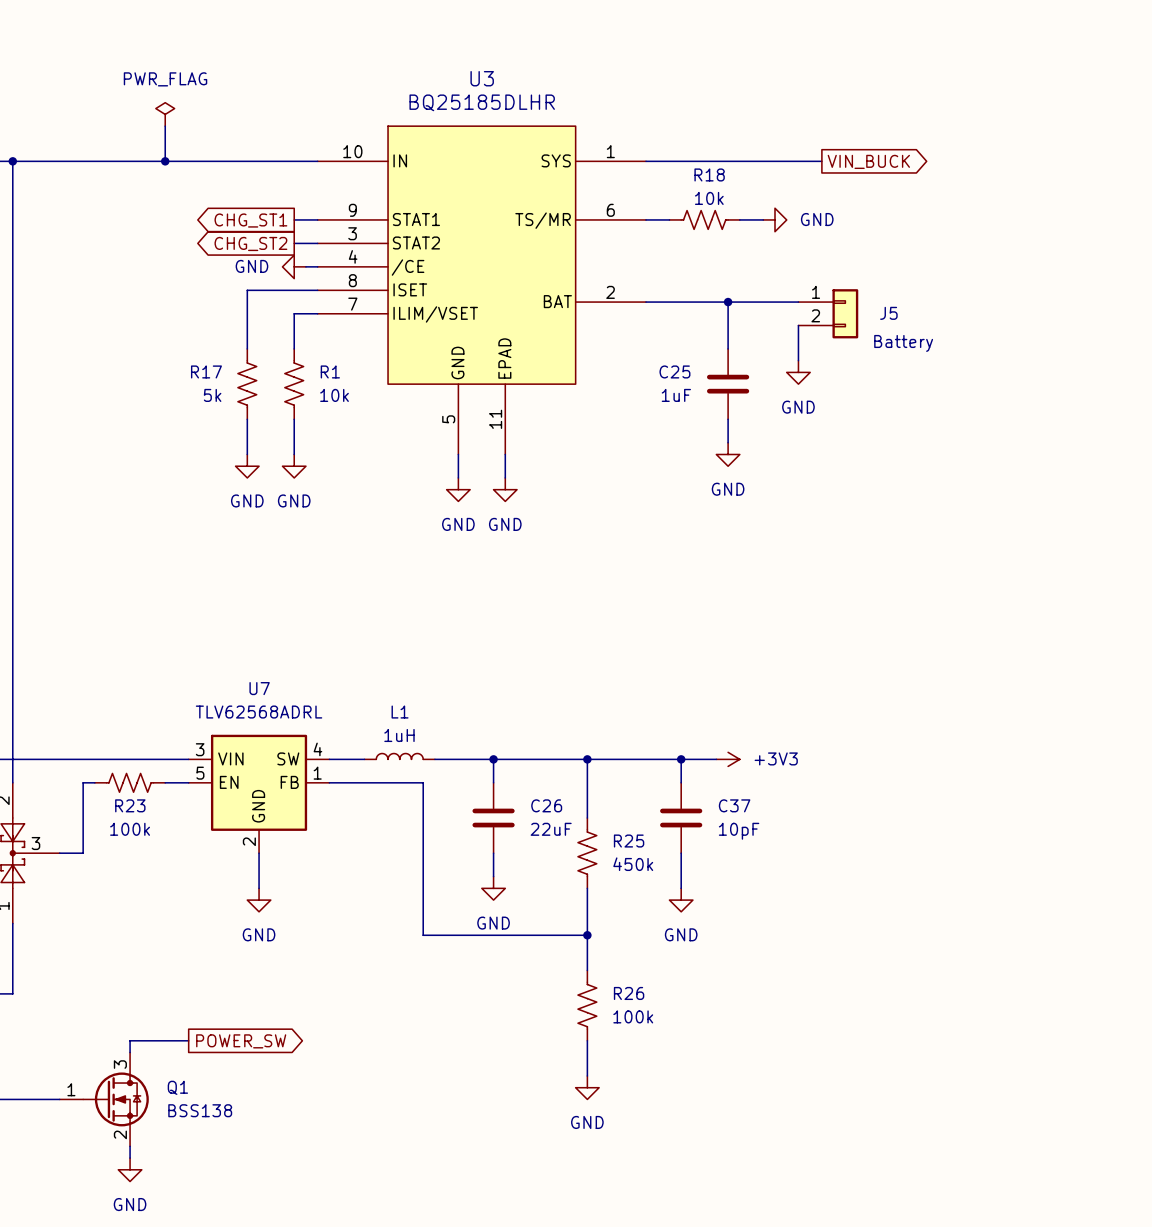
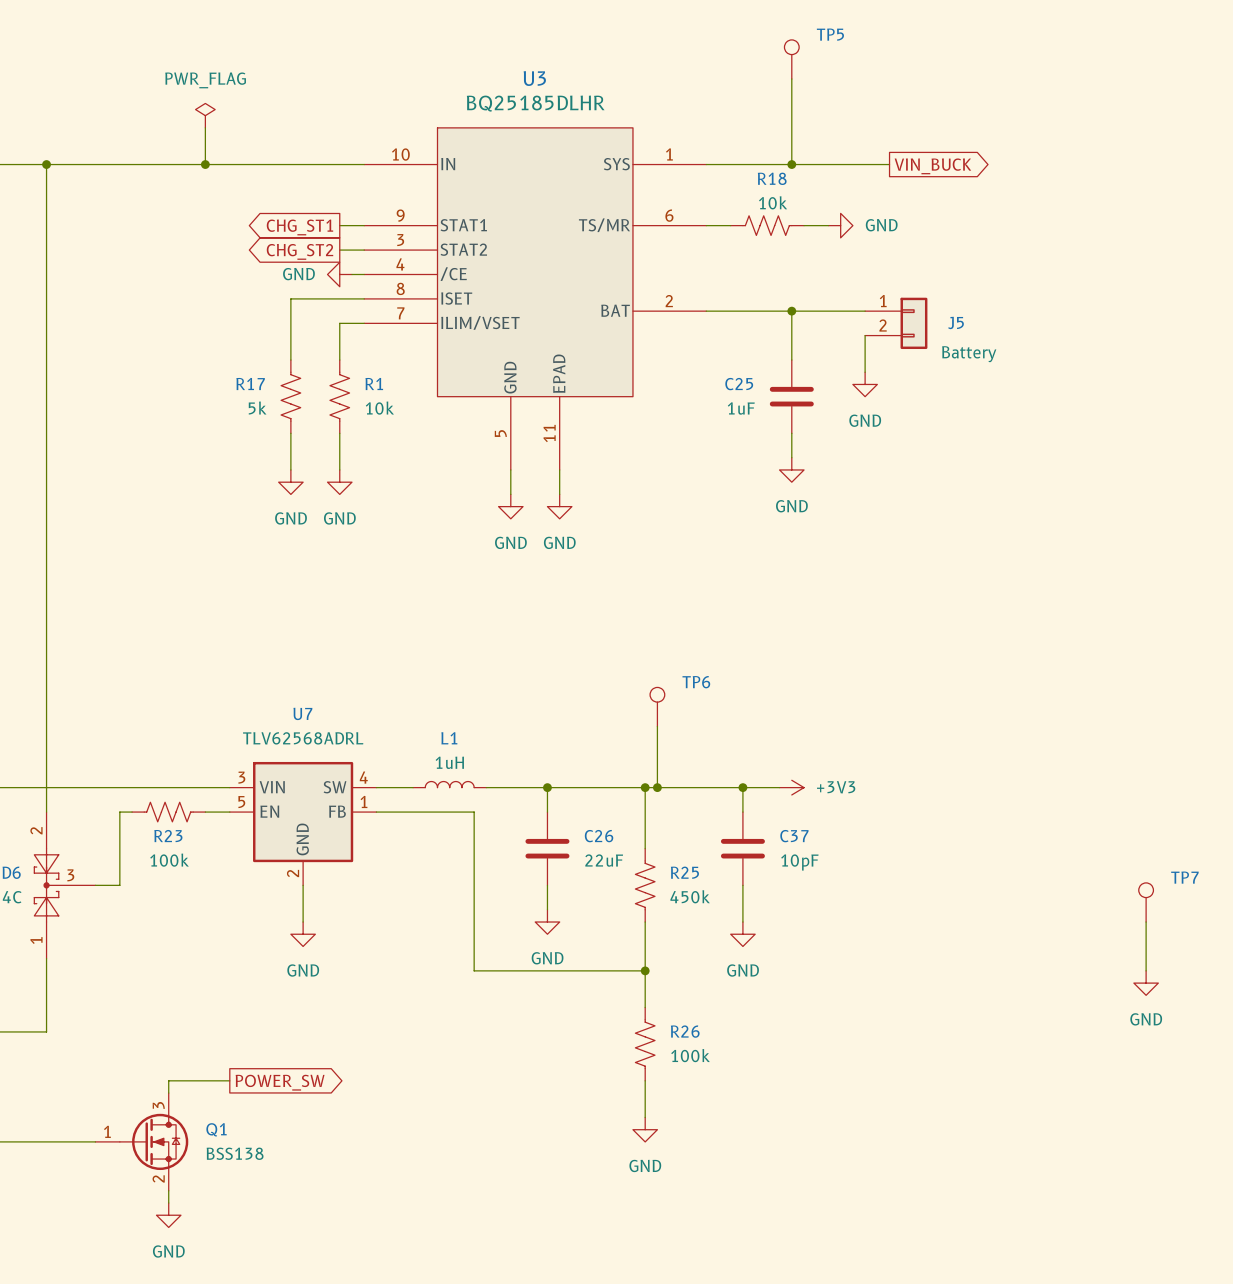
TP5: none -> (791, 59)
wire: none -> (791, 79) (791, 164)
junction: none -> (791, 164)
TP6: none -> (657, 706)
wire: none -> (657, 726) (657, 787)
junction: none -> (657, 787)
TP7: none -> (1146, 902)
wire: none -> (1146, 922) (1146, 970)
power symbol: none -> GND (1146, 983)

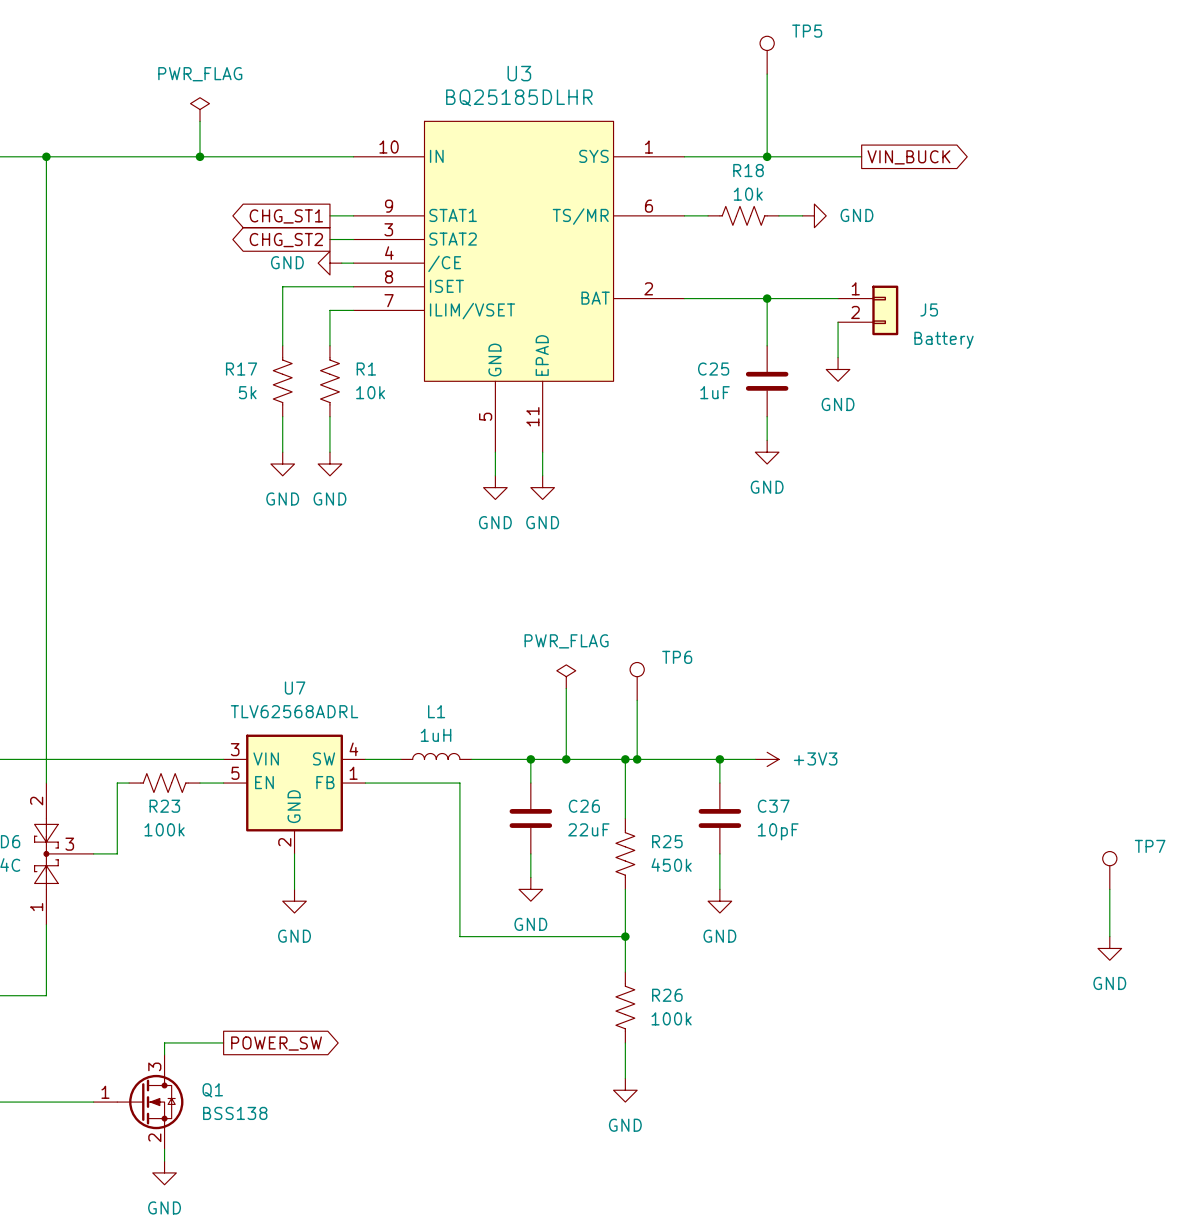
power symbol: none -> PWR_FLAG (566, 676)
wire: none -> (566, 688) (566, 759)
junction: none -> (566, 759)

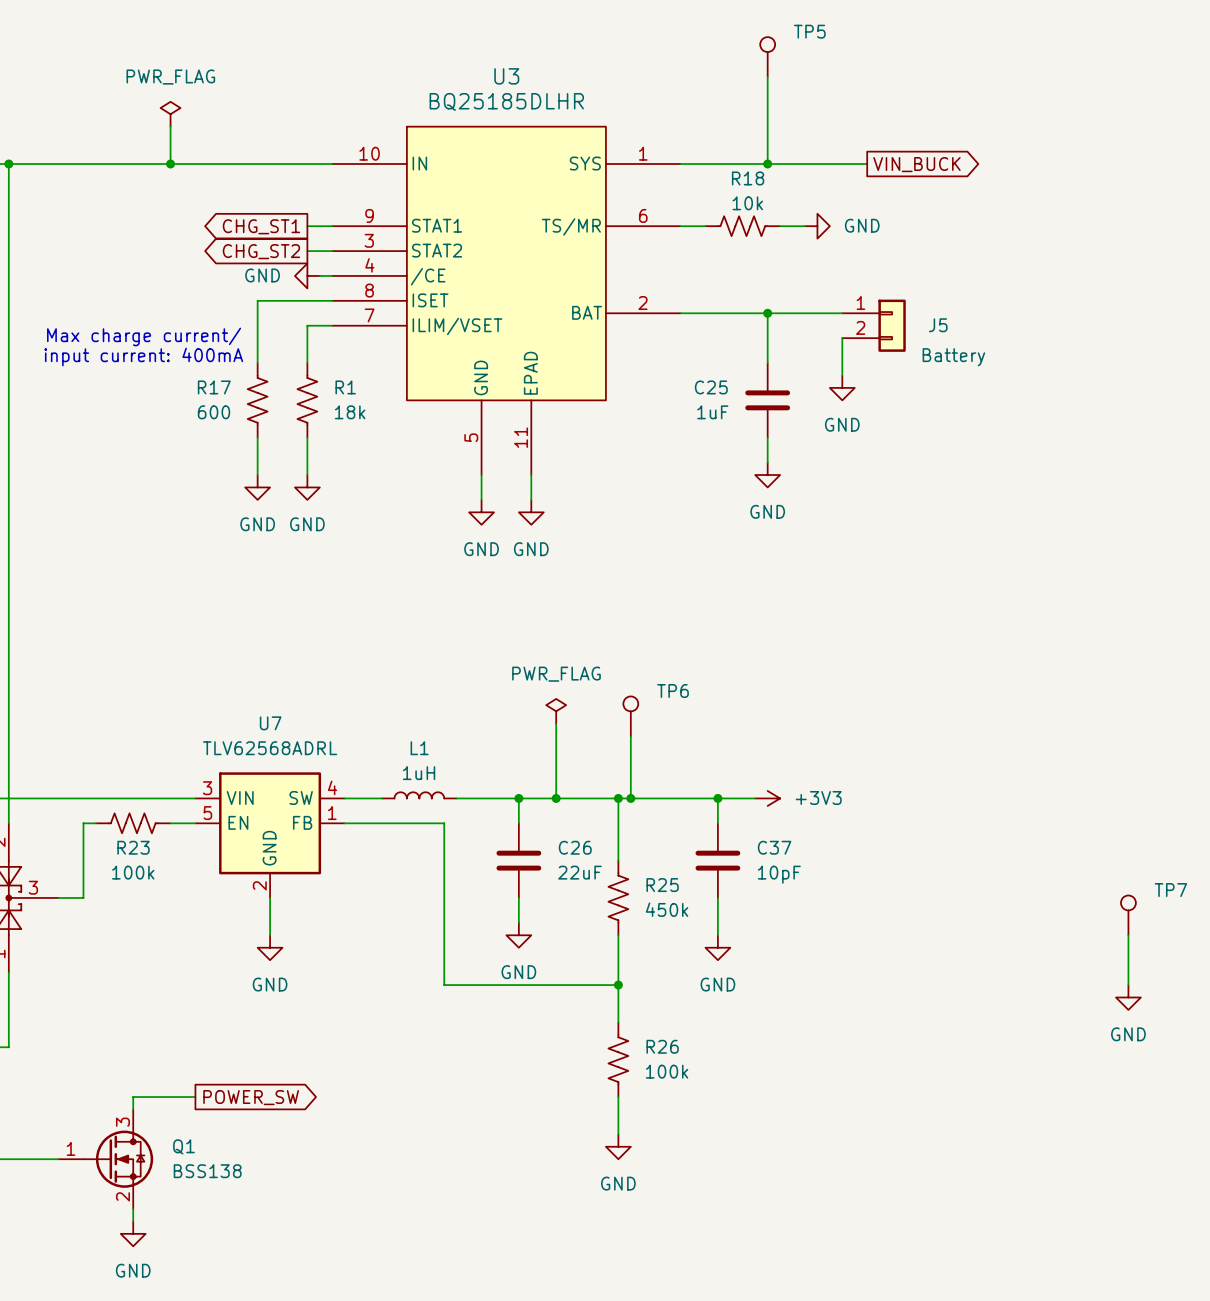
text: none -> Max charge current/ (144, 336)
text: none -> input current: 400mA (143, 356)
R17 value: 5k (247, 392) -> 600 (213, 412)
R1 value: 10k (370, 392) -> 18k (350, 412)

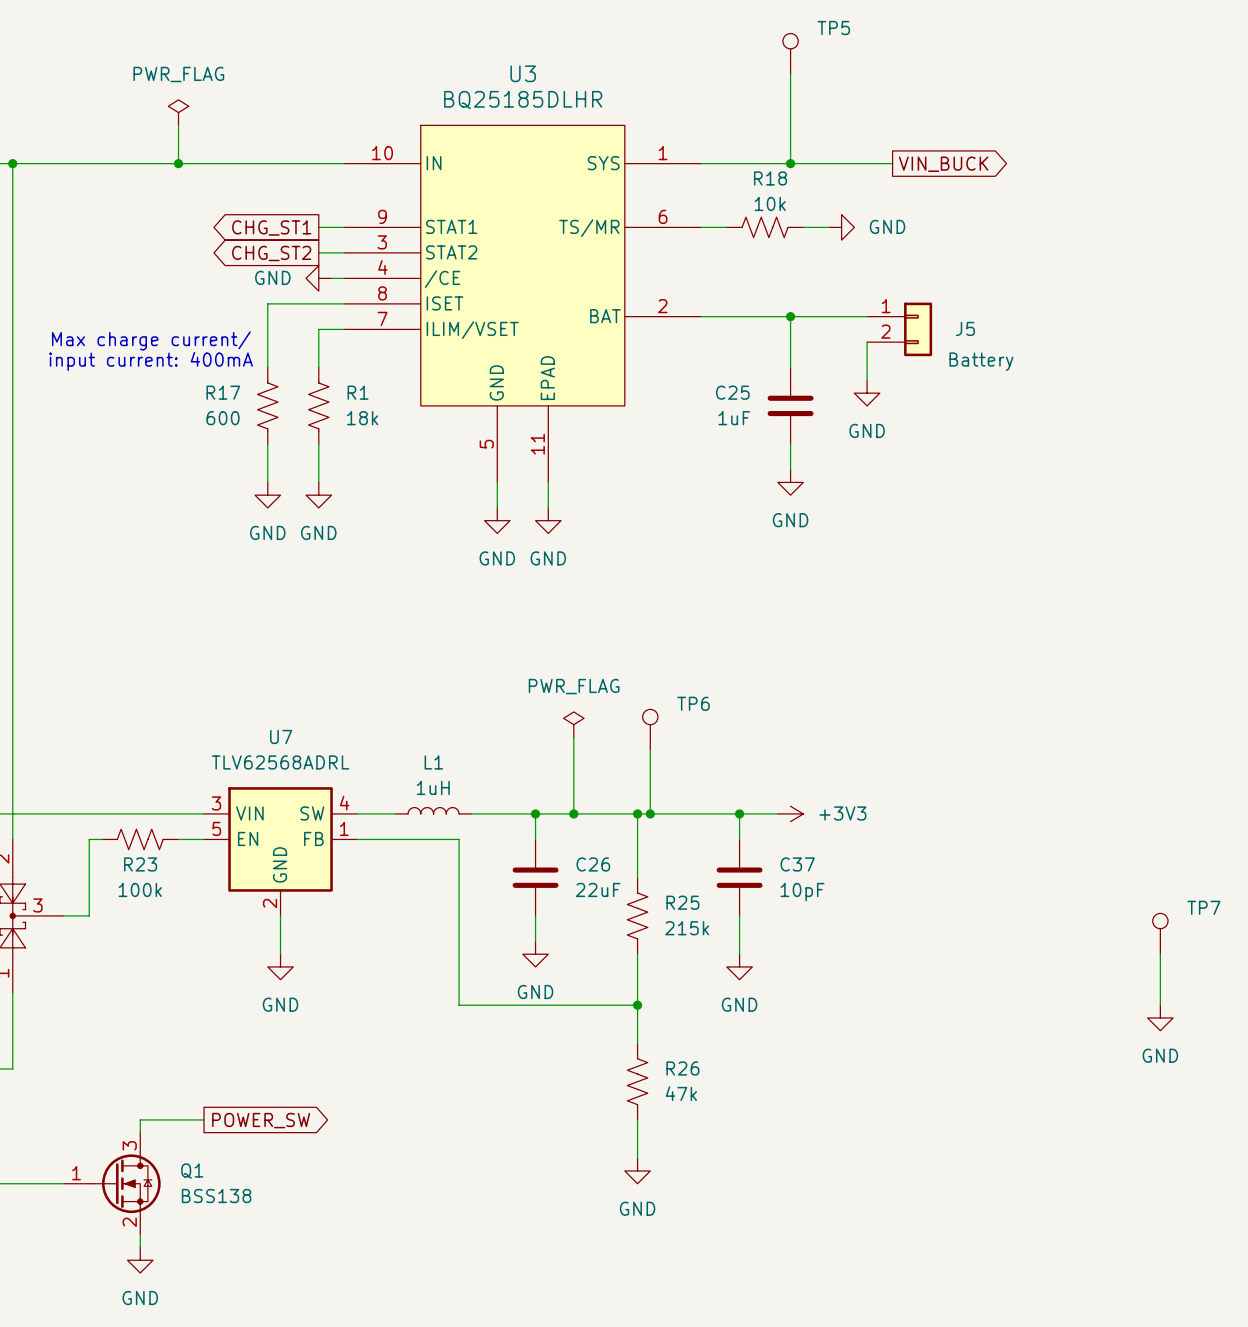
R25 value: 450k (667, 909) -> 215k (687, 928)
R26 value: 100k (667, 1071) -> 47k (681, 1093)

